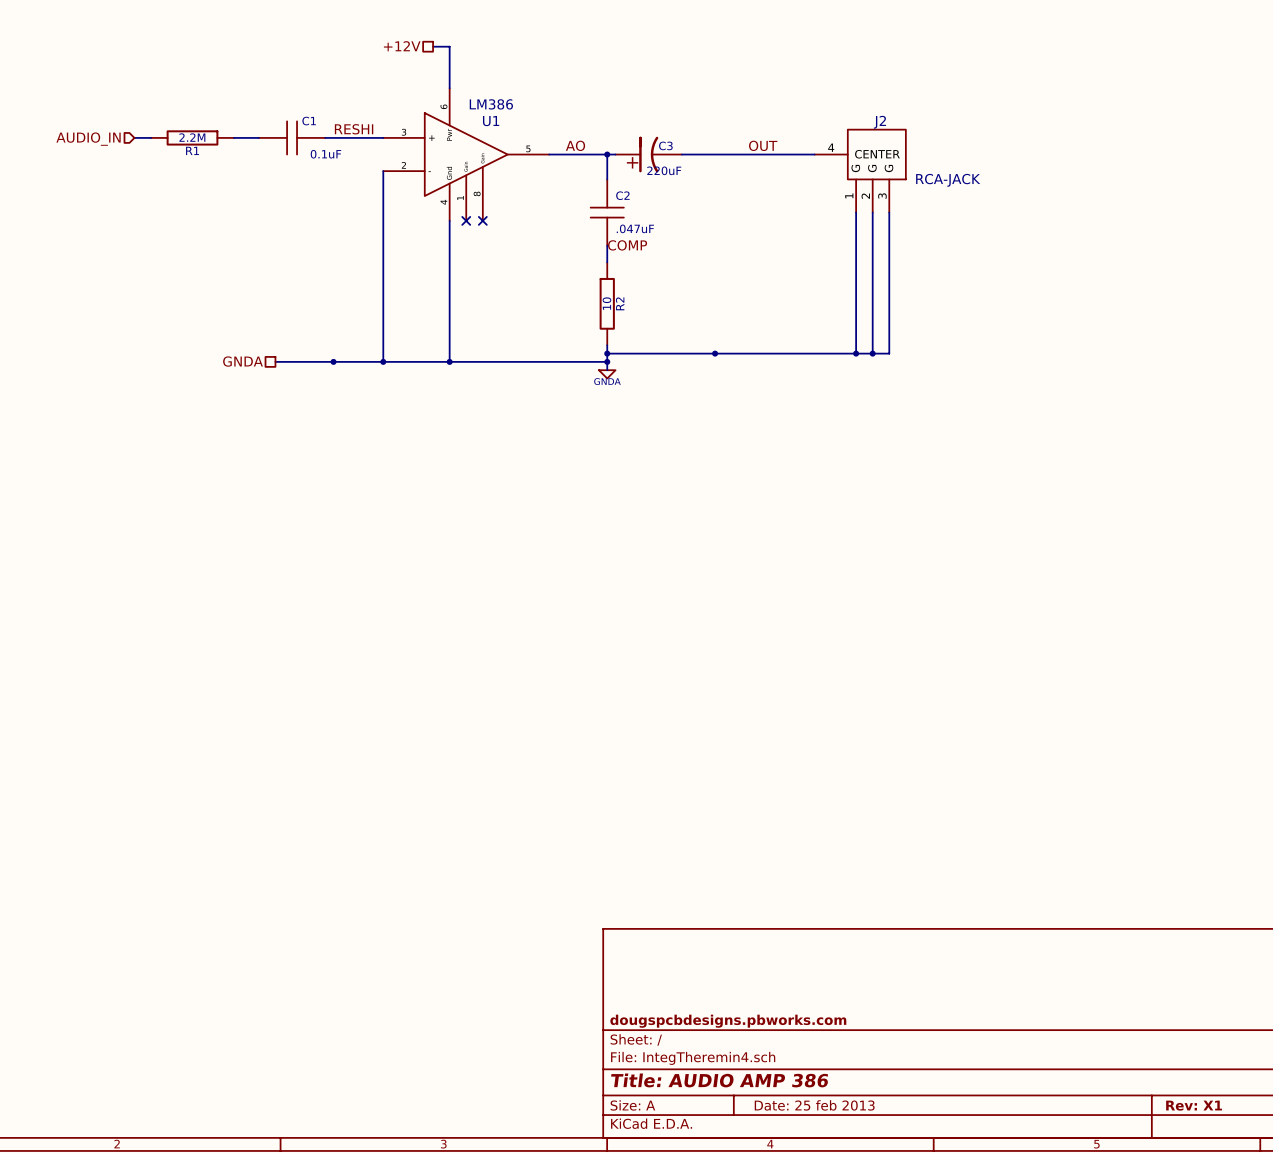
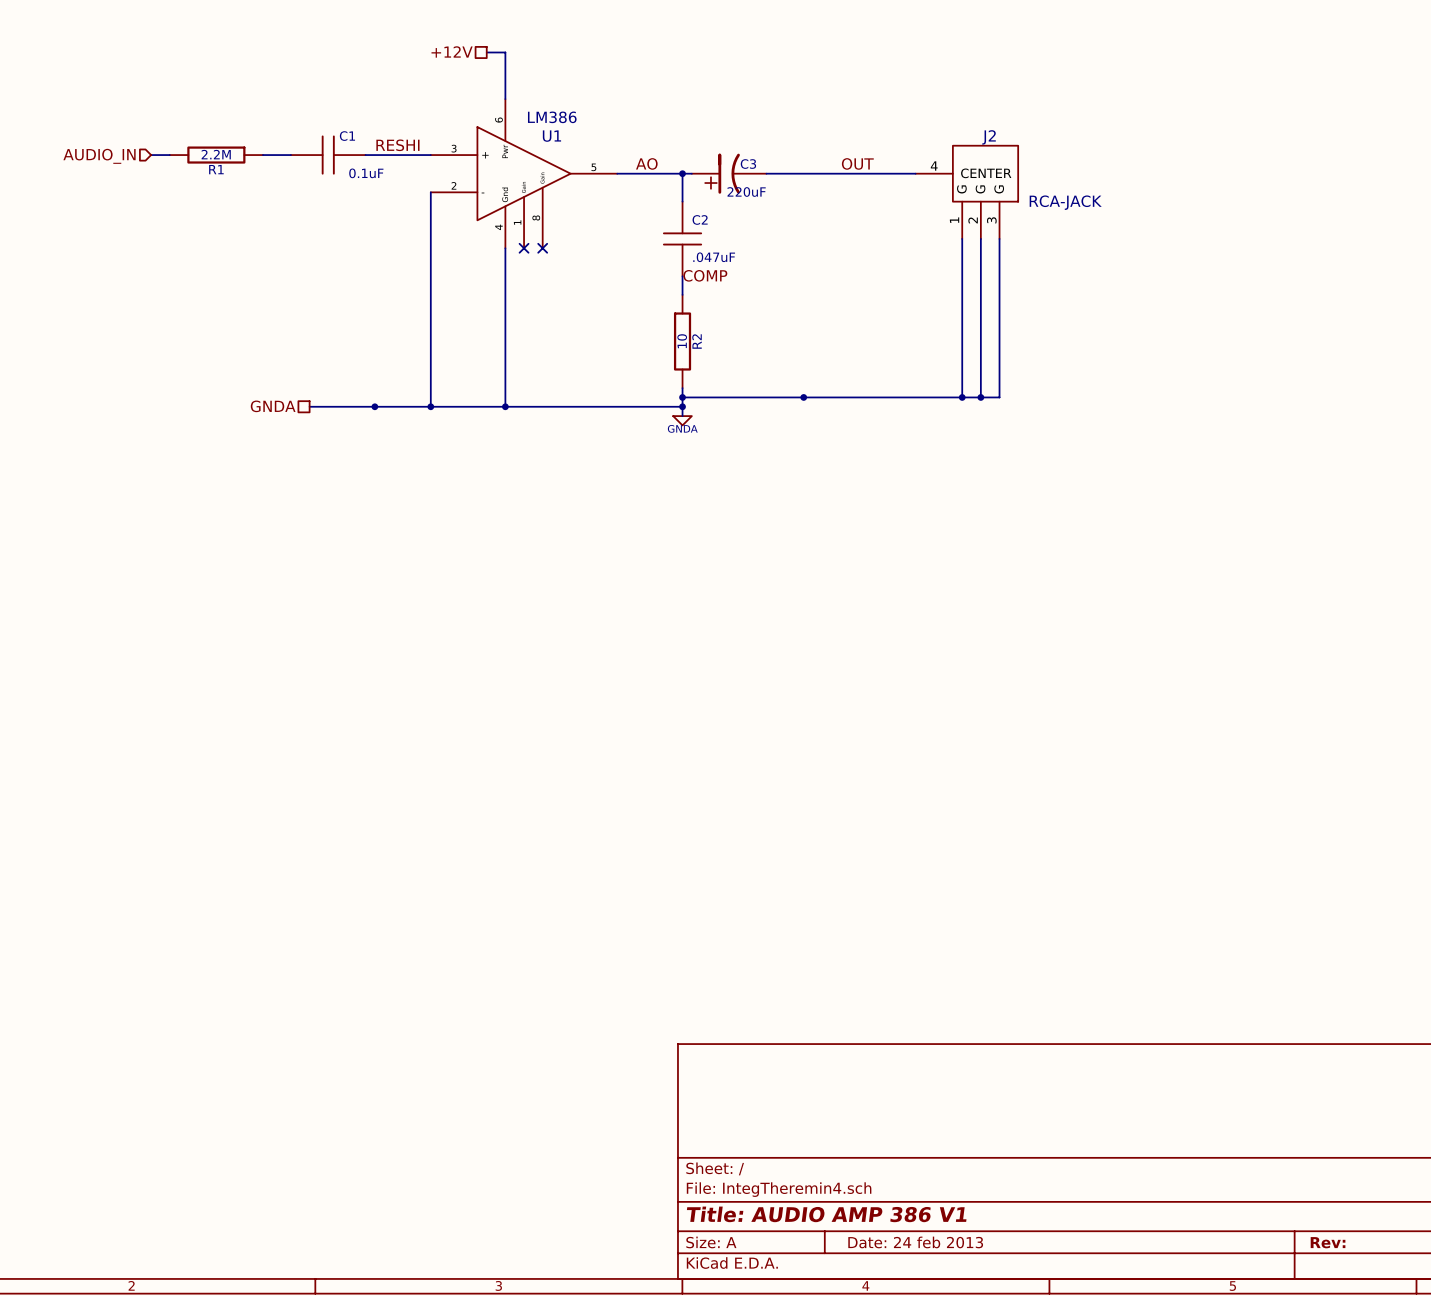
title block: dougspcbdesigns.pbworks.com (728, 1021) -> none
title block: Title: AUDIO AMP 386 (719, 1080) -> Title: AUDIO AMP 386 V1 (826, 1214)
title block: Date: 25 feb 2013 (814, 1105) -> Date: 24 feb 2013 (915, 1242)
title block: Rev: X1 (1194, 1105) -> Rev: (1328, 1242)

